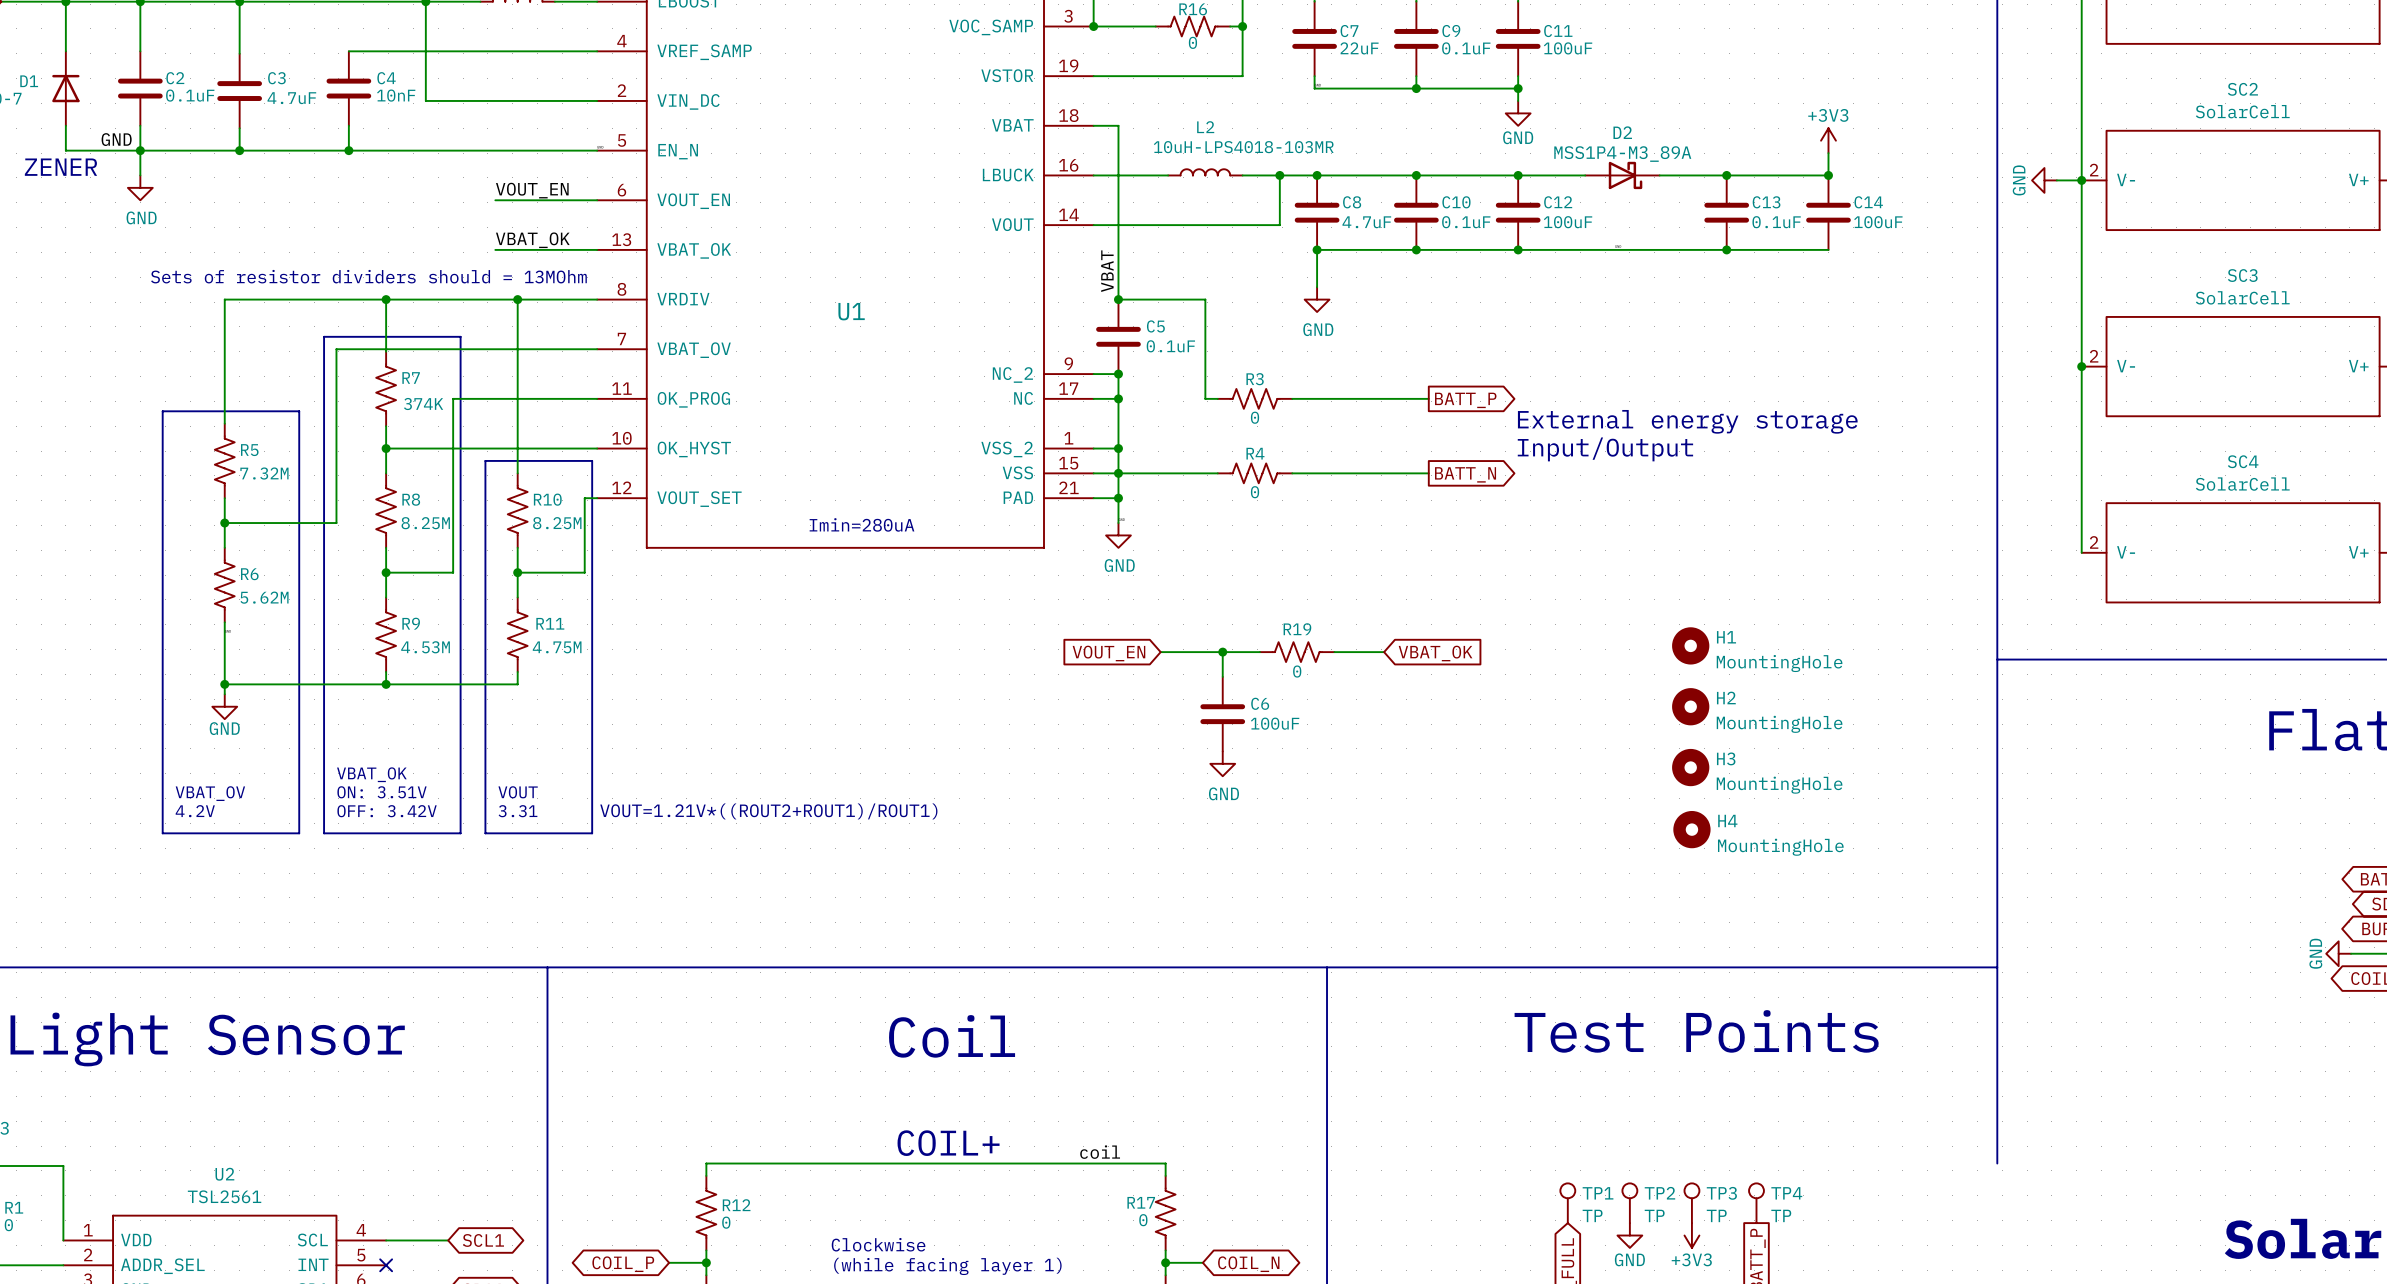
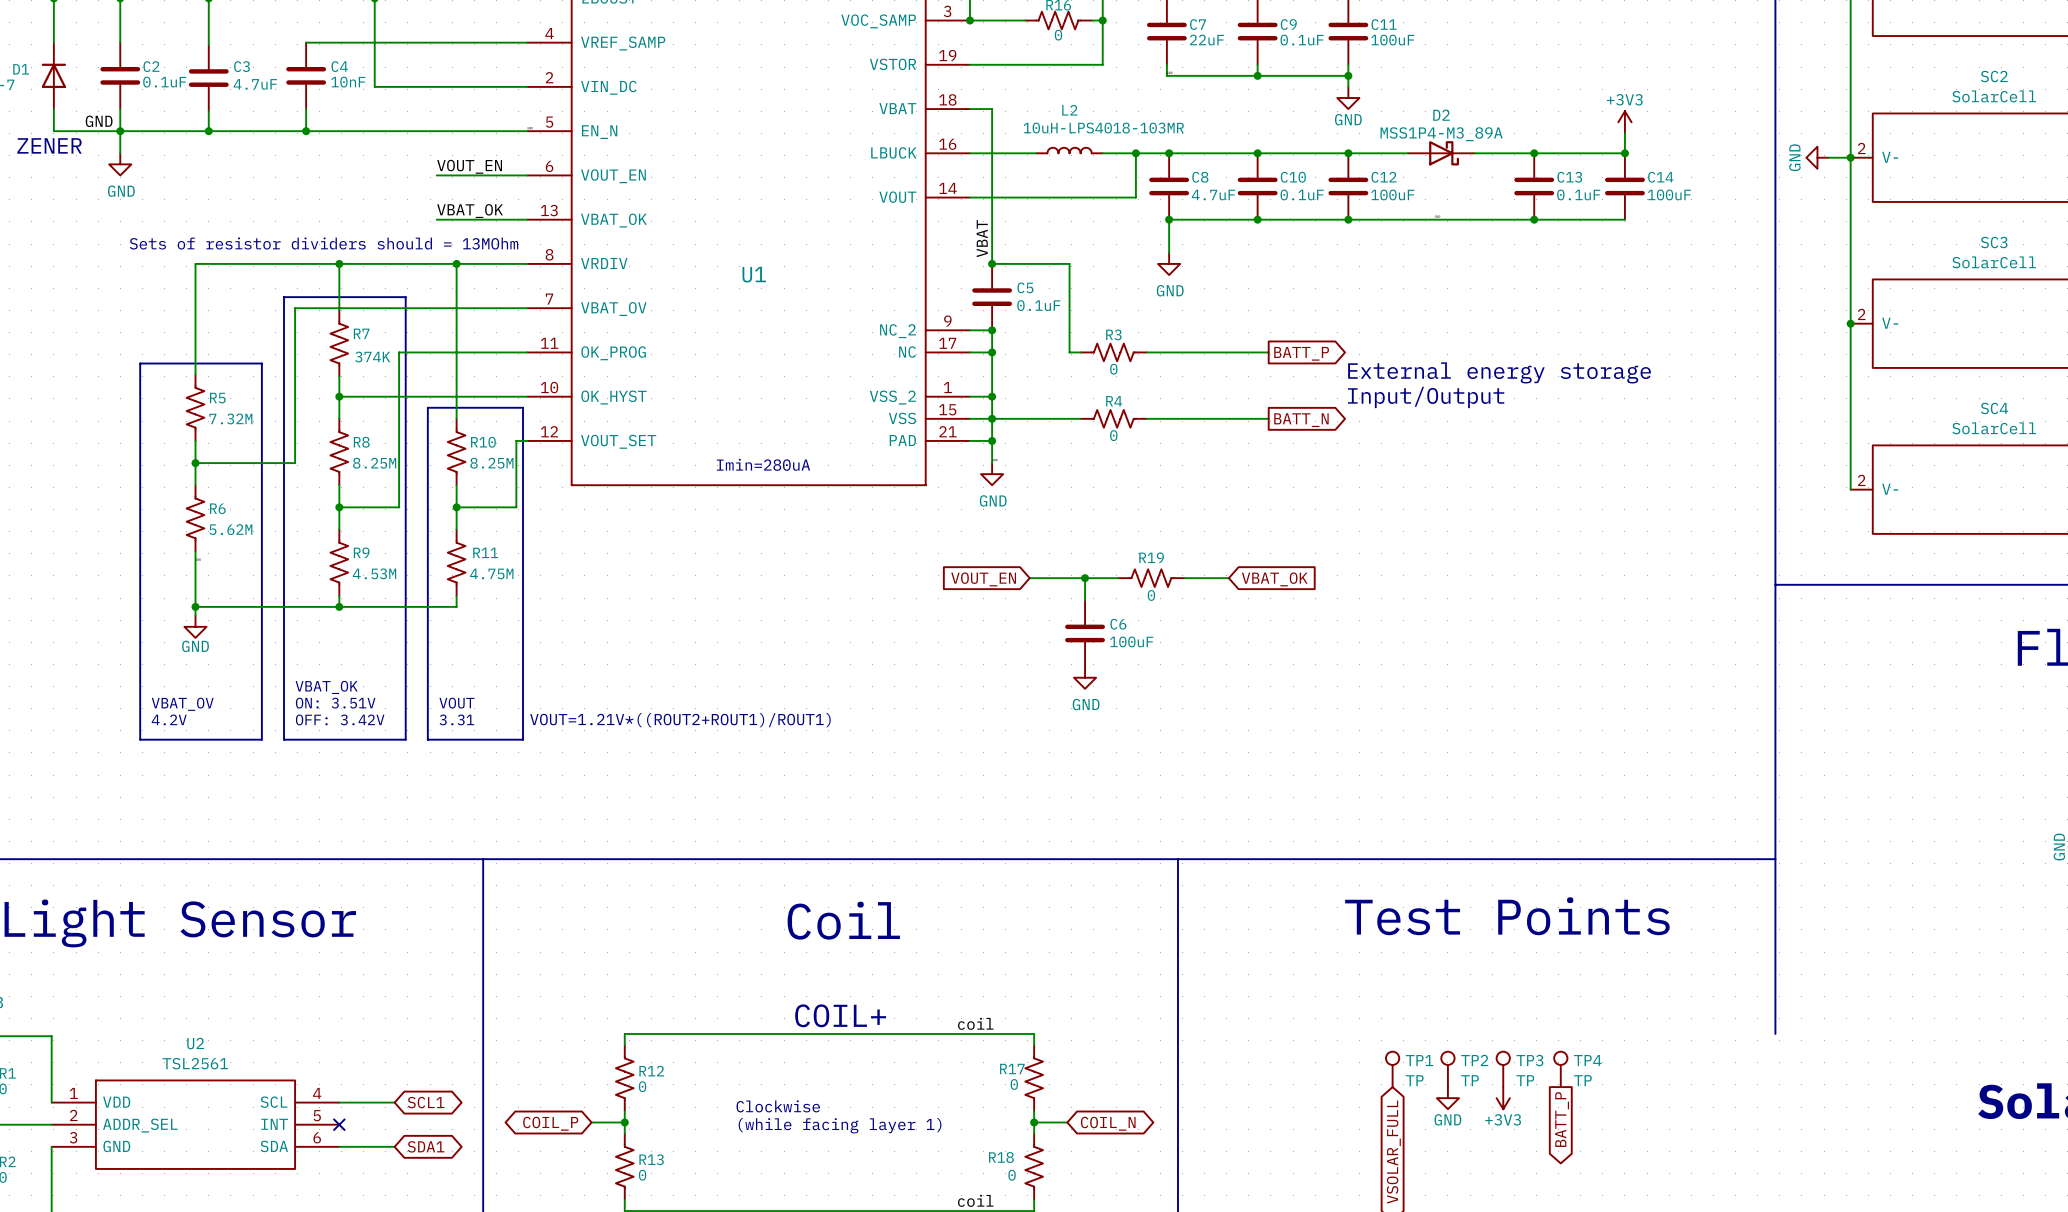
H1: MountingHole (1690, 645) -> none
H2: MountingHole (1690, 706) -> none
H3: MountingHole (1690, 767) -> none
H4: MountingHole (1691, 829) -> none

